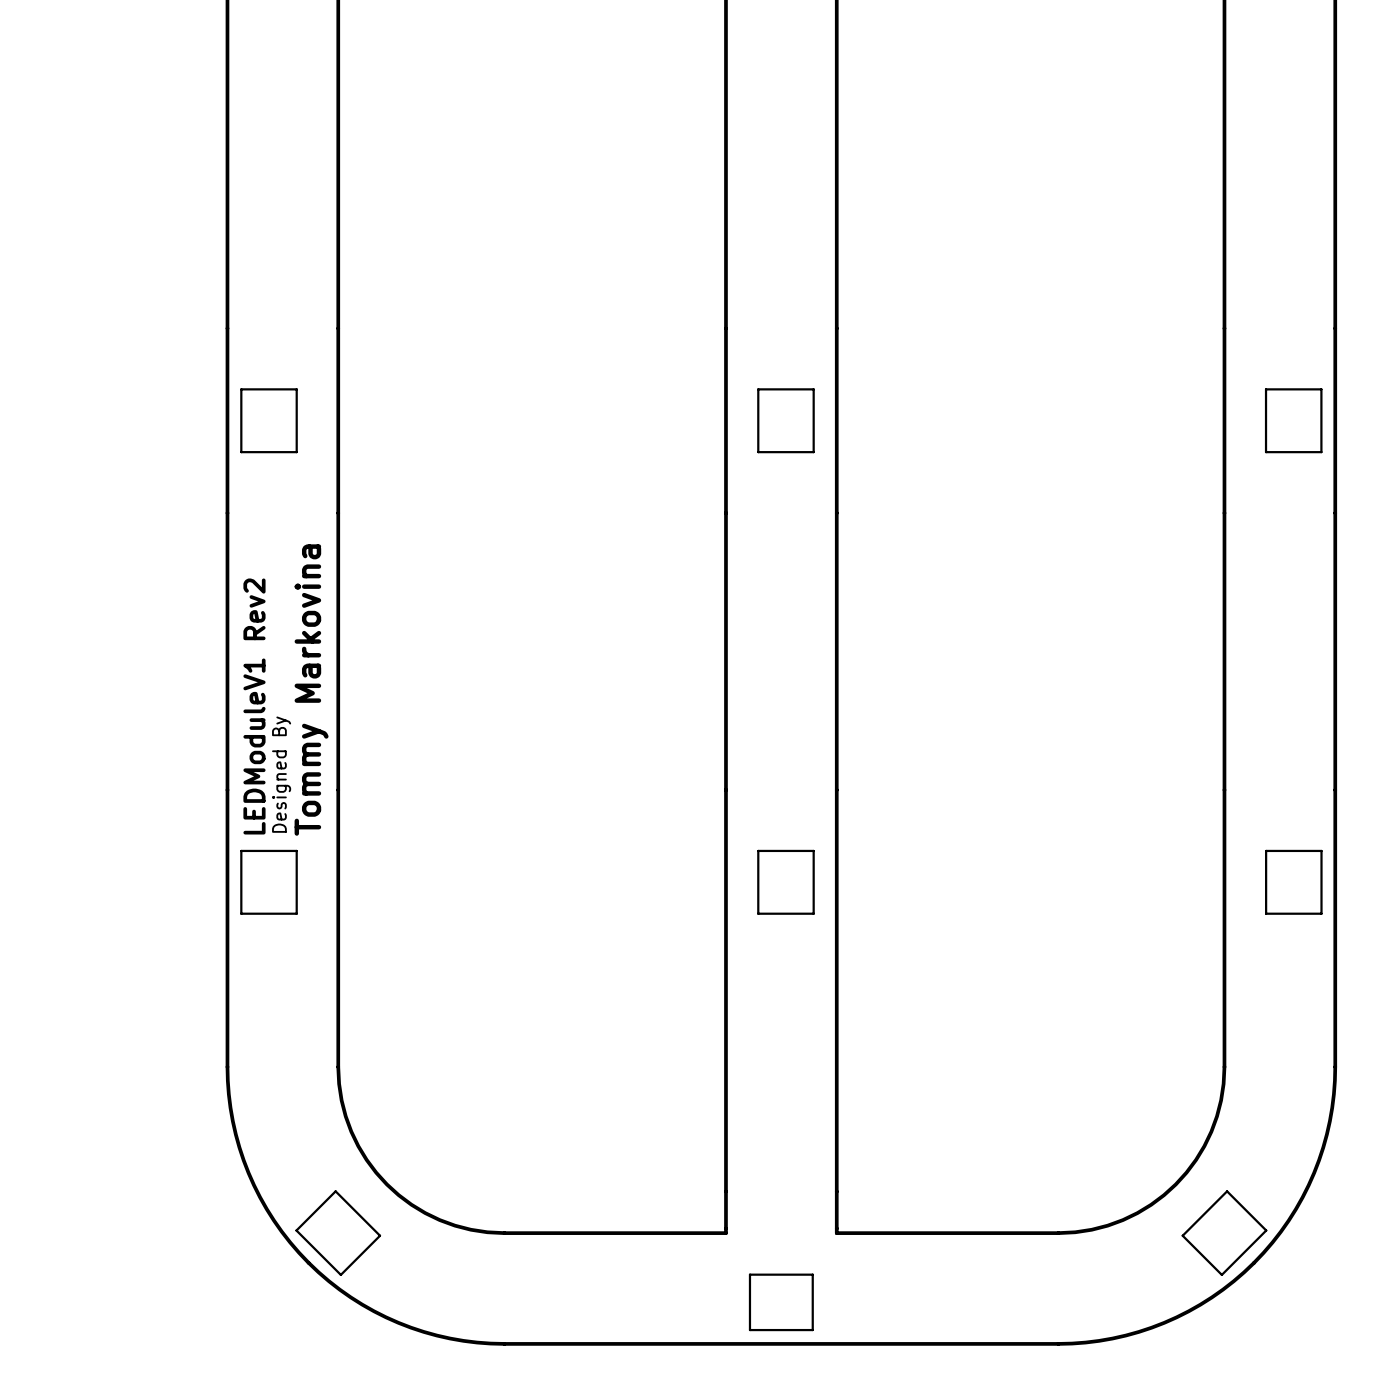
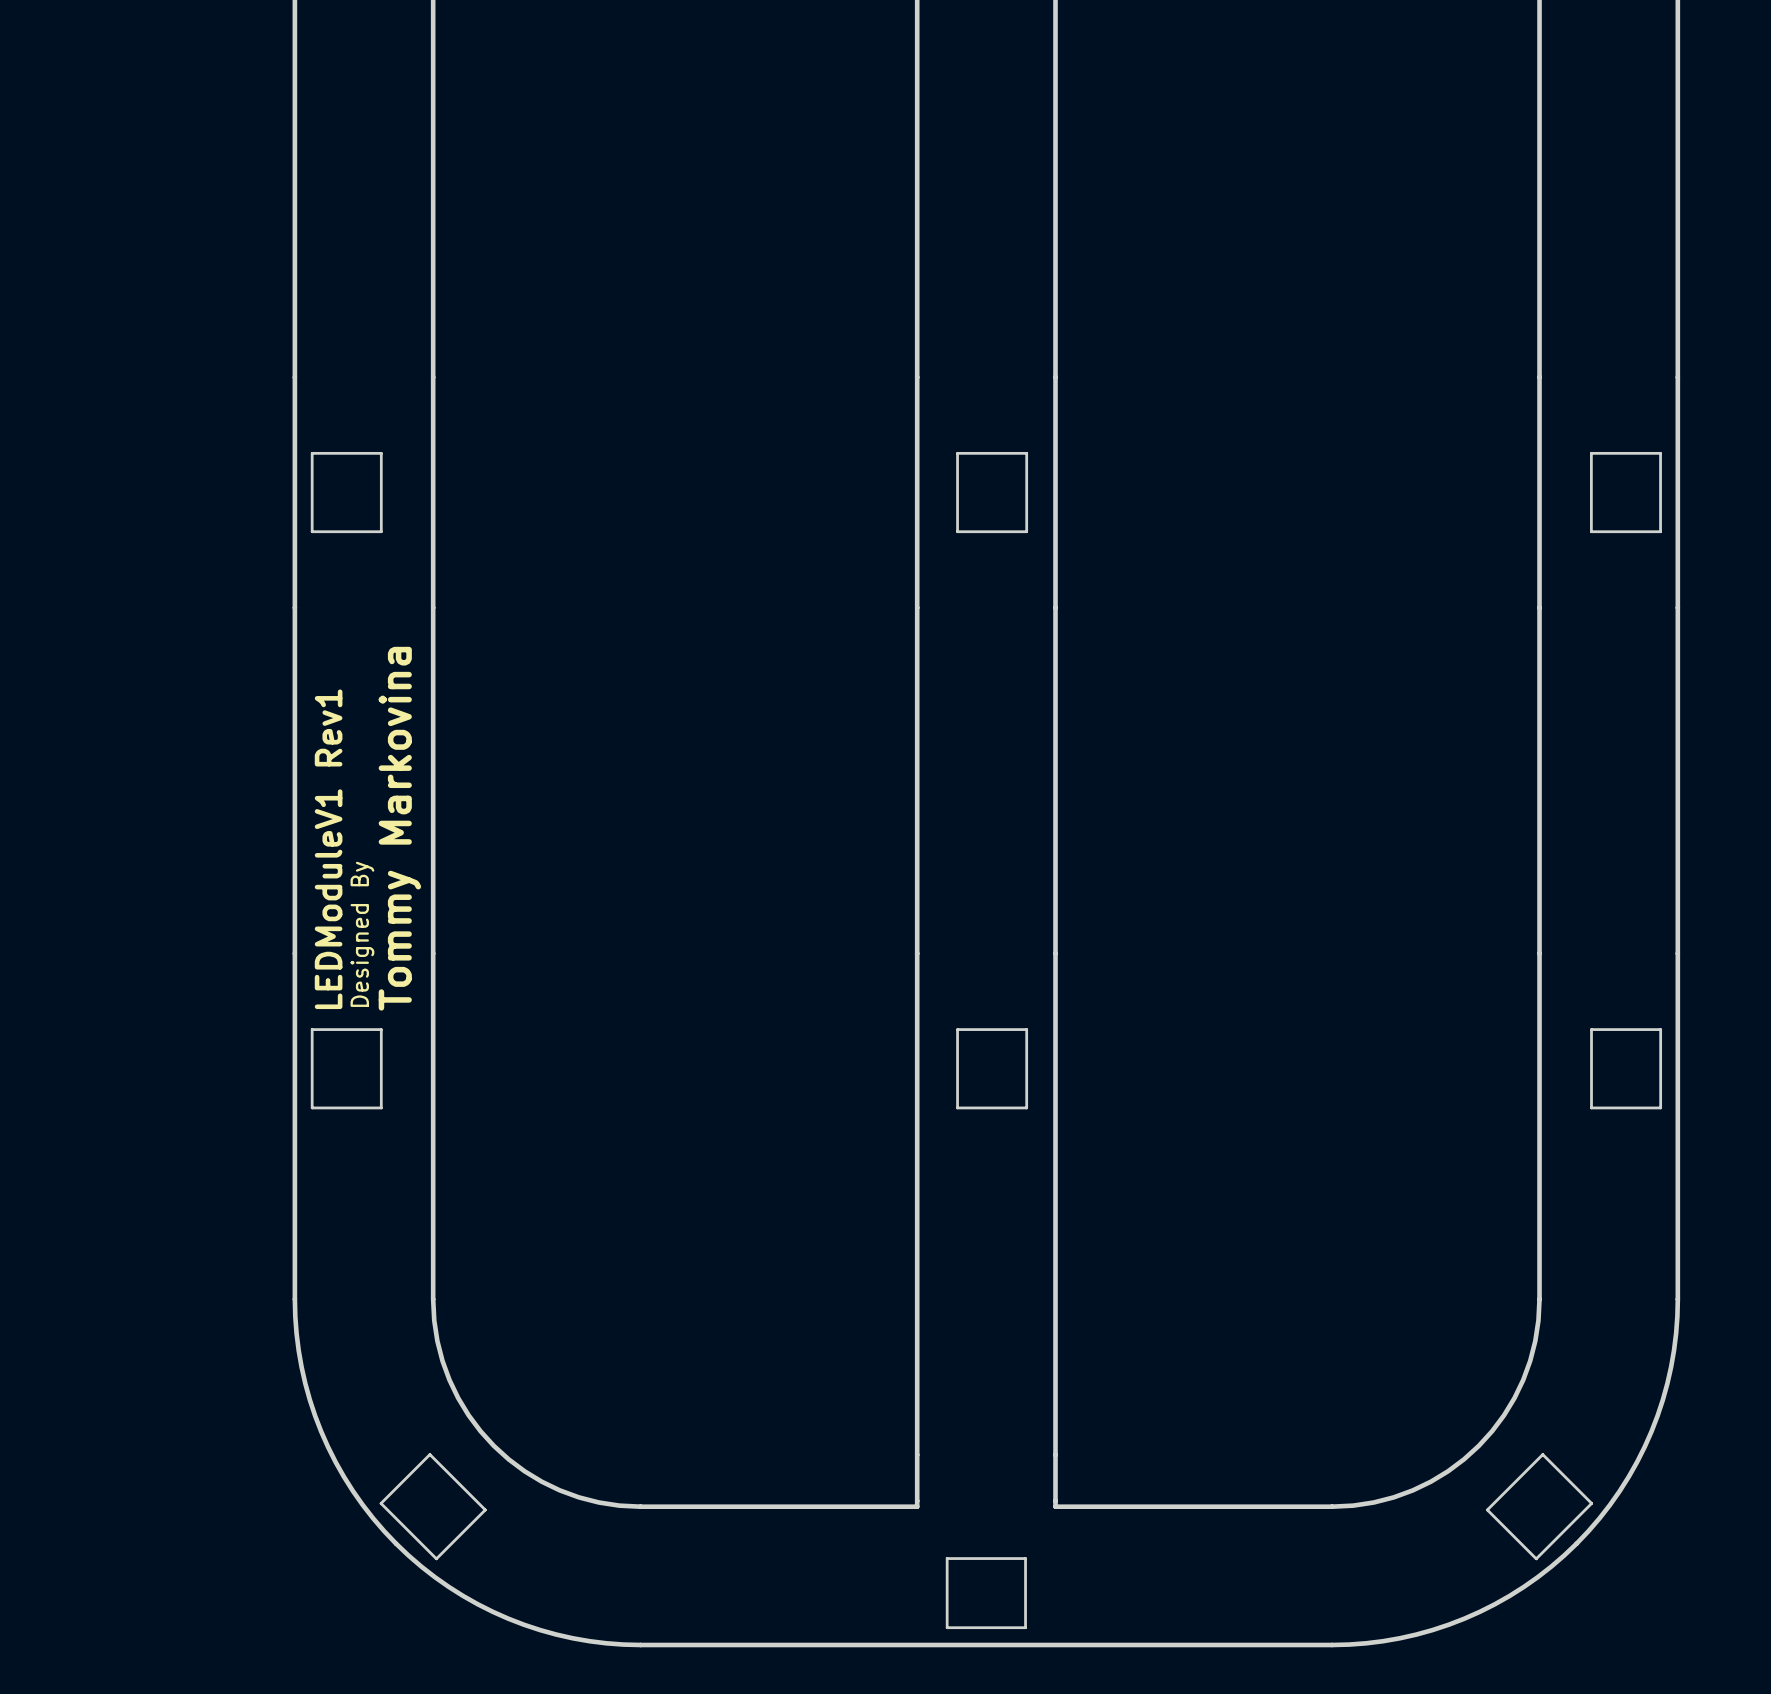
text: LEDModuleV1 Rev2 (254, 706) -> LEDModuleV1 Rev1 (328, 849)

